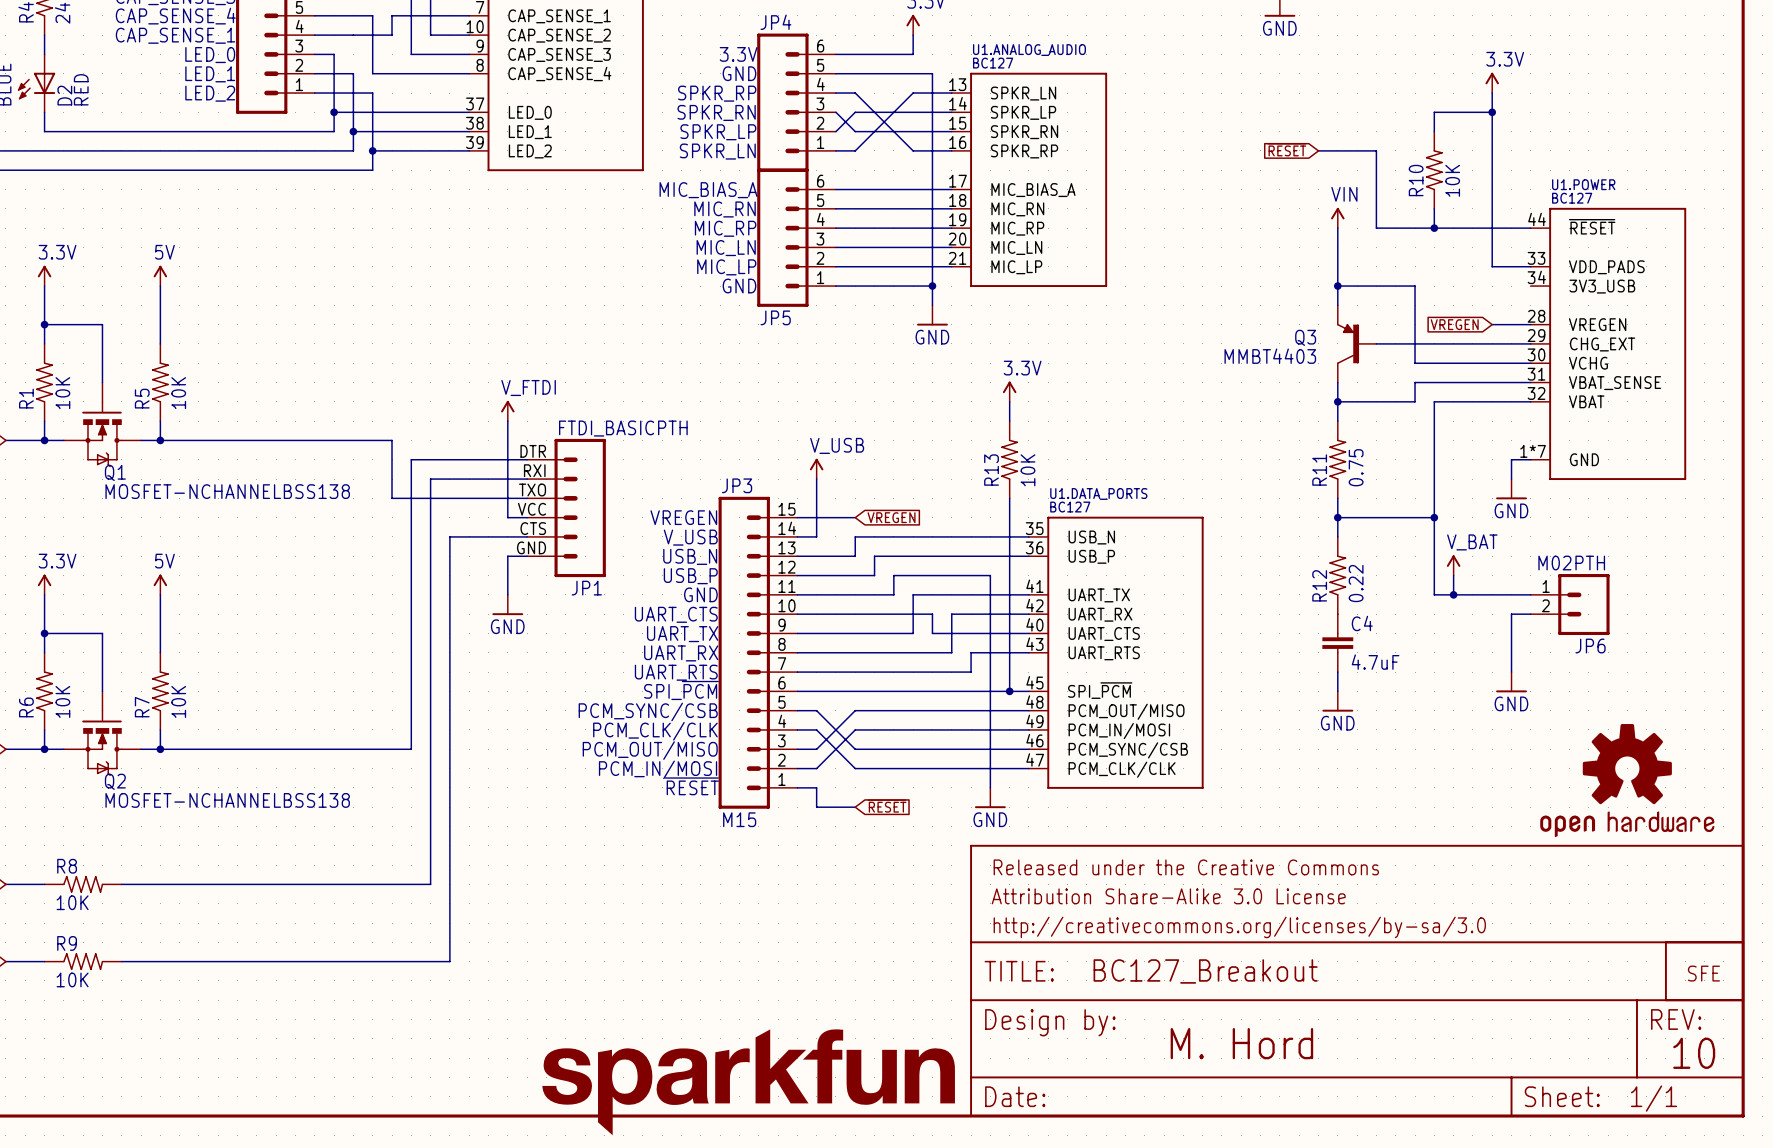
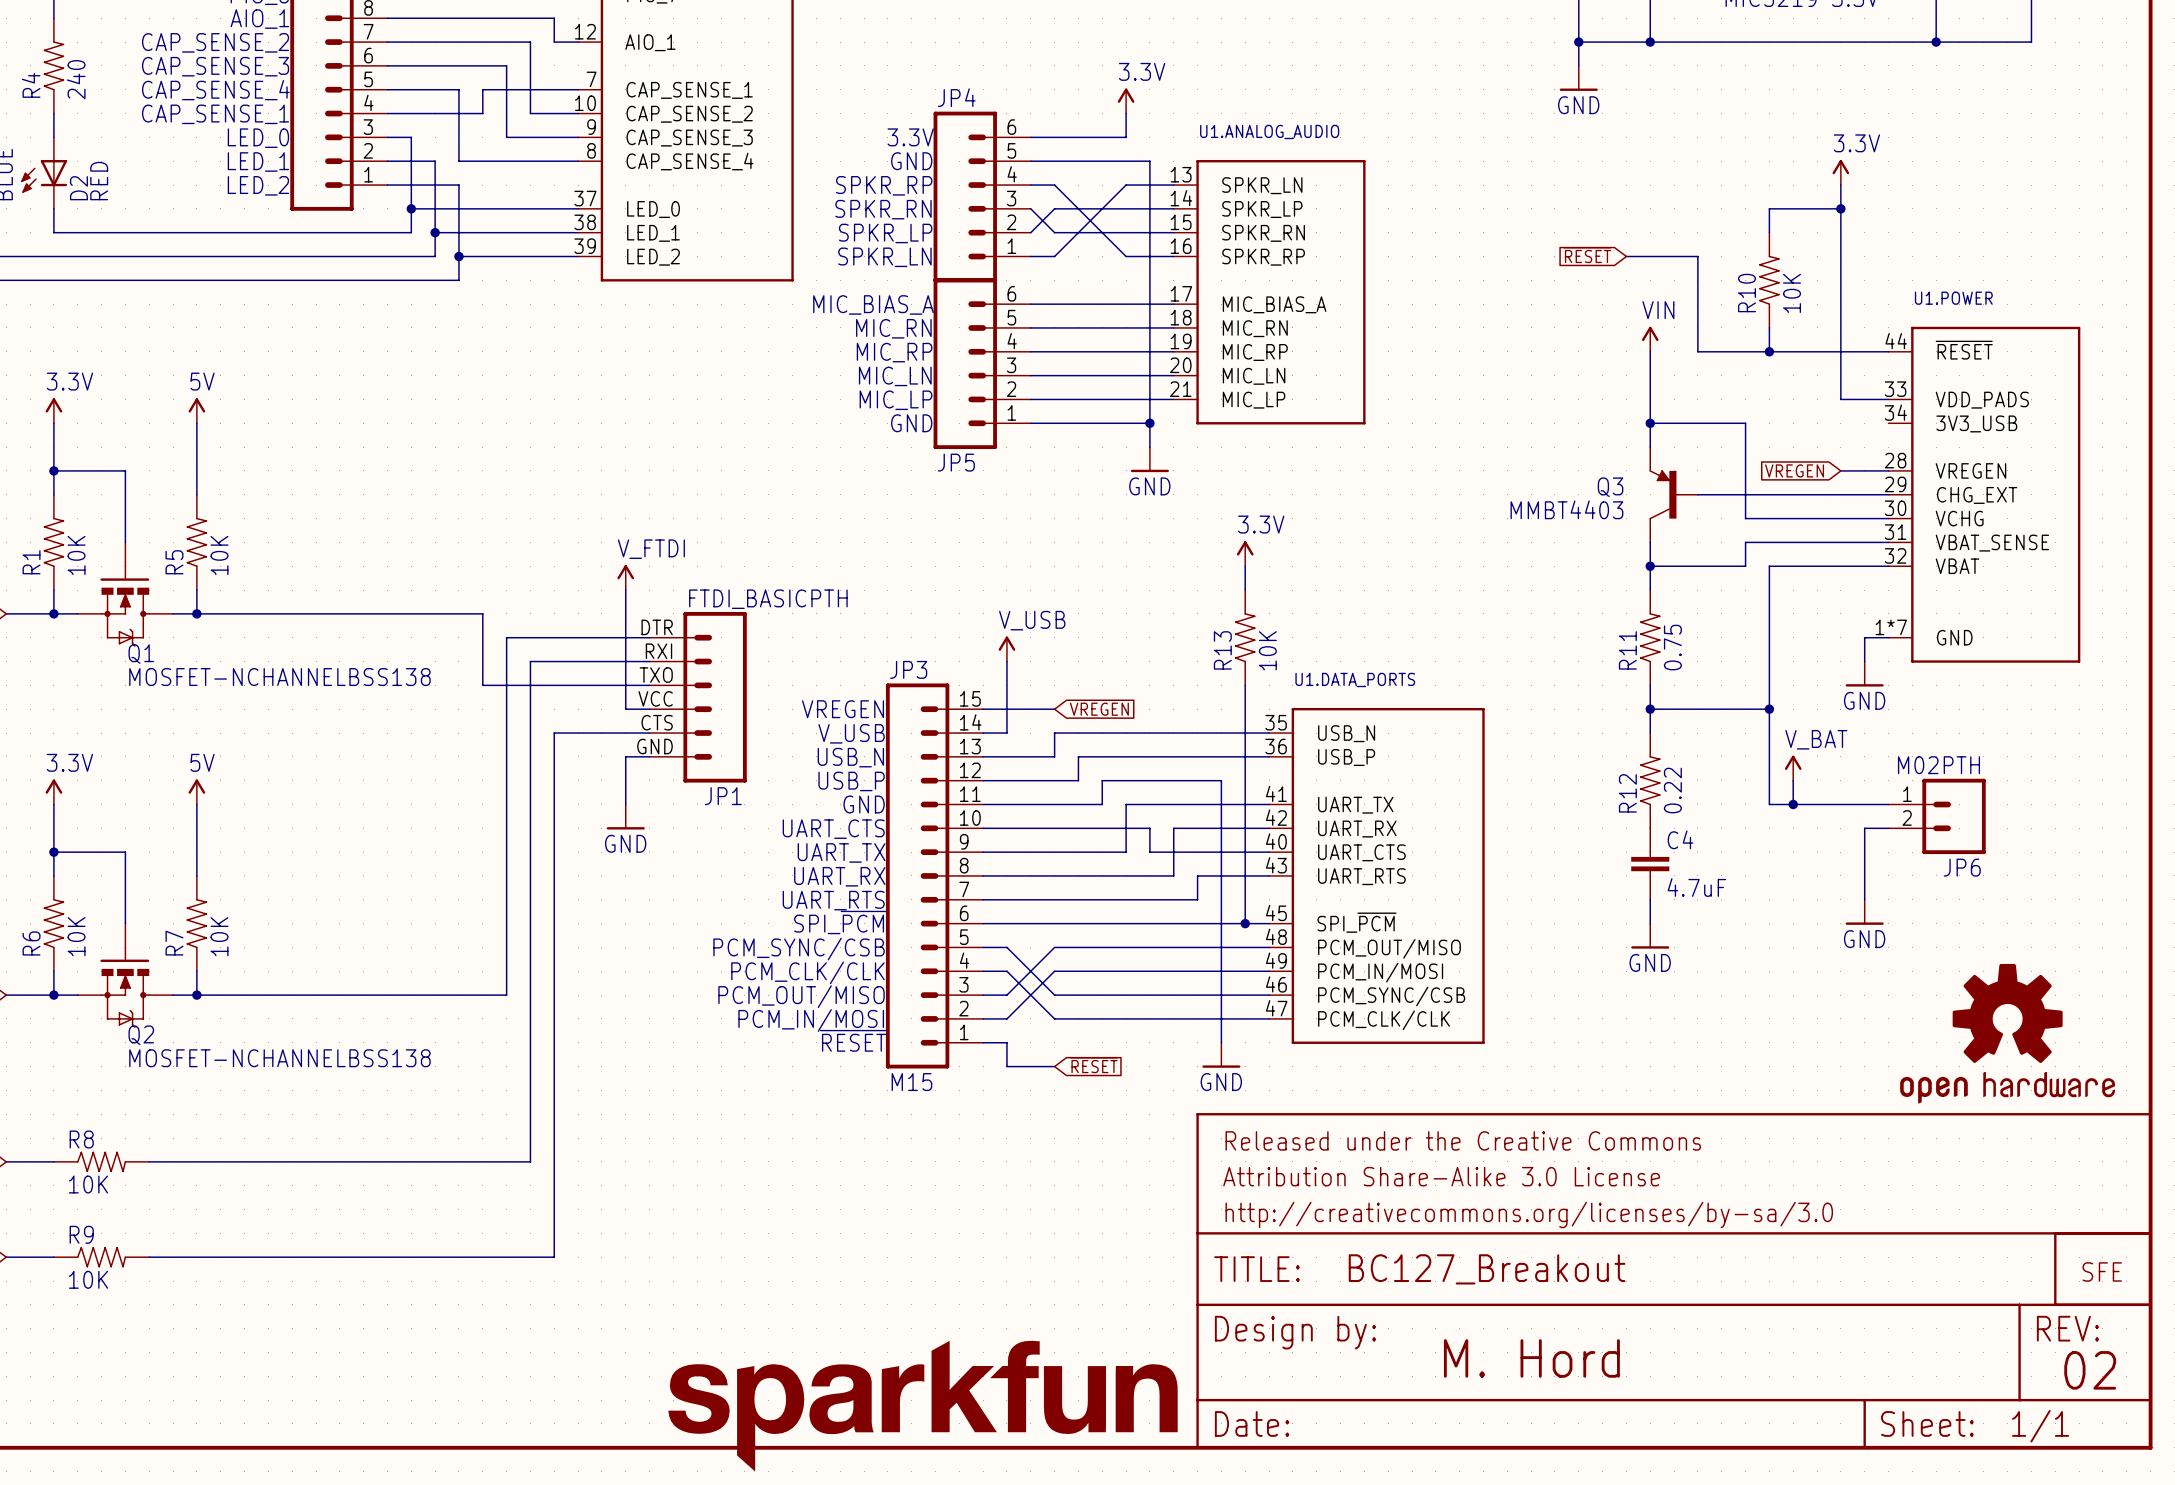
U1.ANALOG_AUDIO value: BC127 (993, 63) -> none
U1.POWER value: BC127 (1572, 198) -> none
U1.DATA_PORTS value: BC127 (1070, 507) -> none
text: 10 (1694, 1053) -> 02 (2090, 1370)

